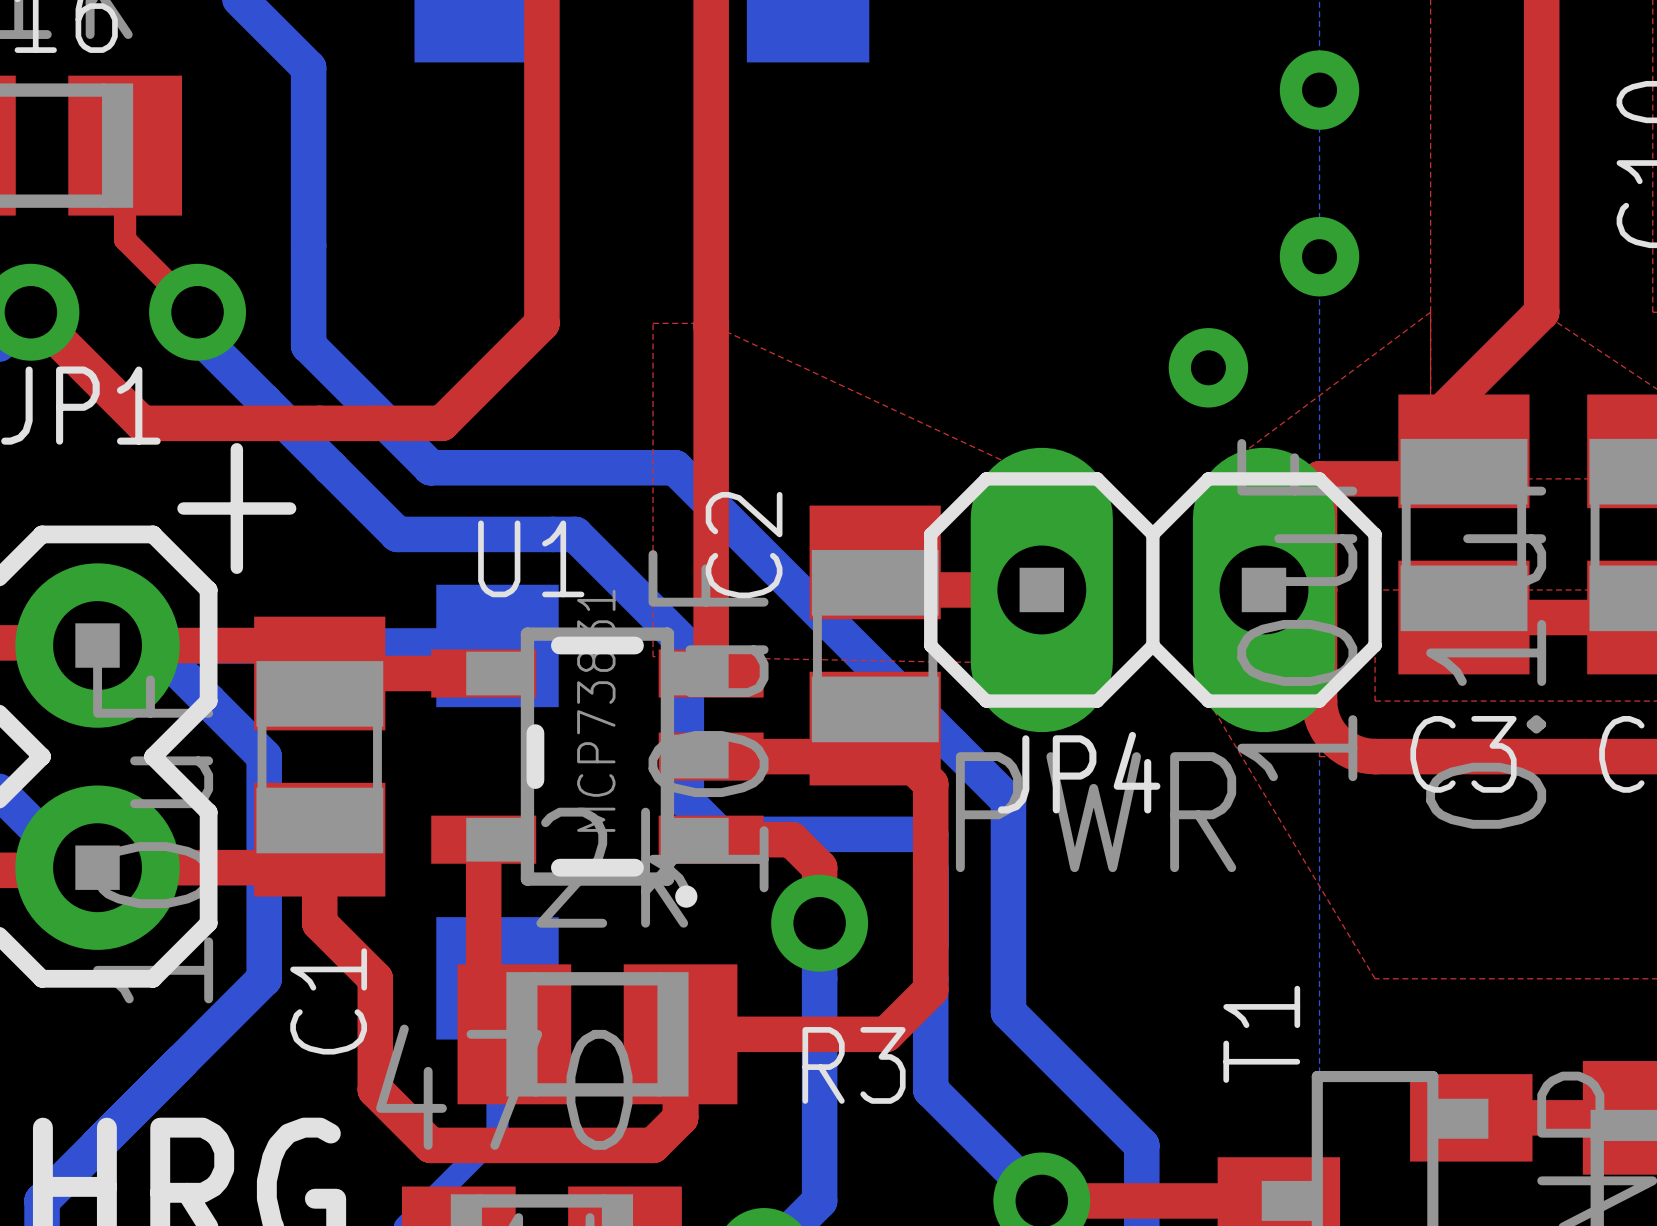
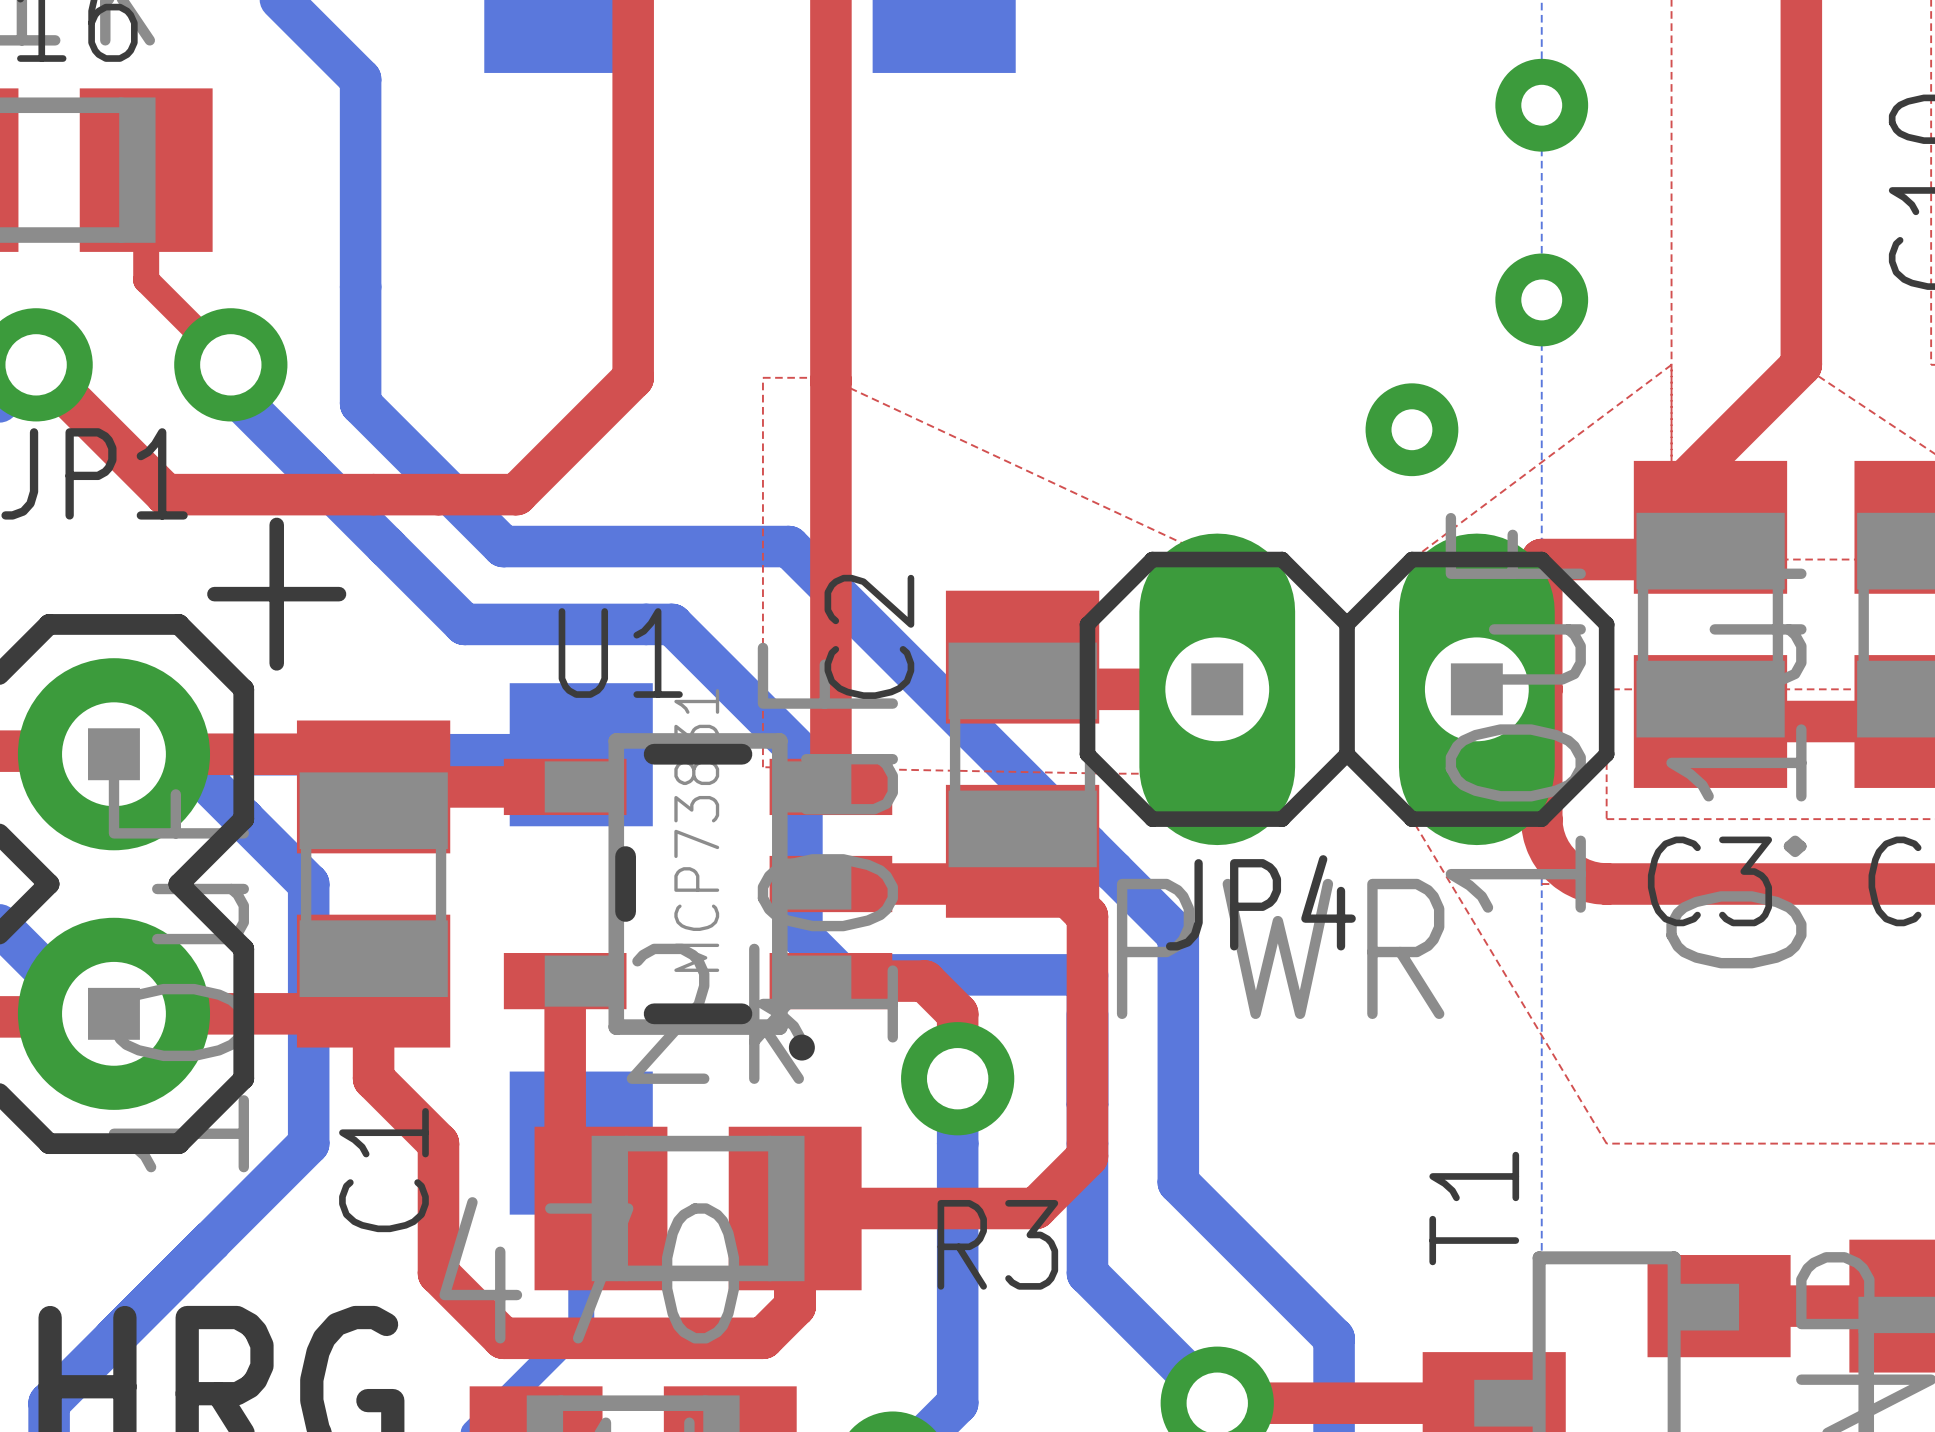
JP4 footprint: [924, 447, 1382, 733] -> [1079, 533, 1615, 846]

